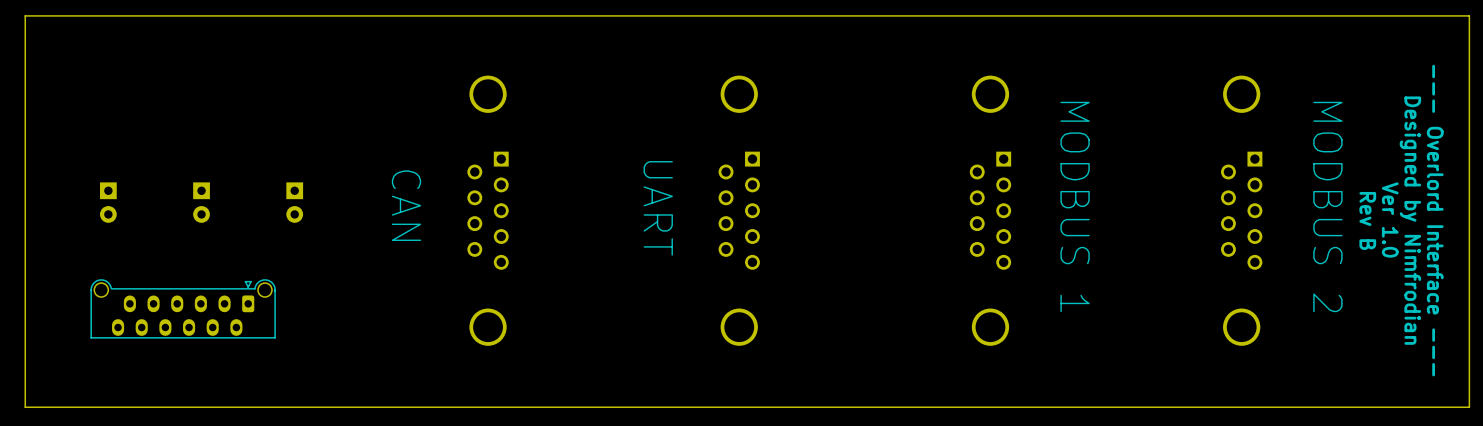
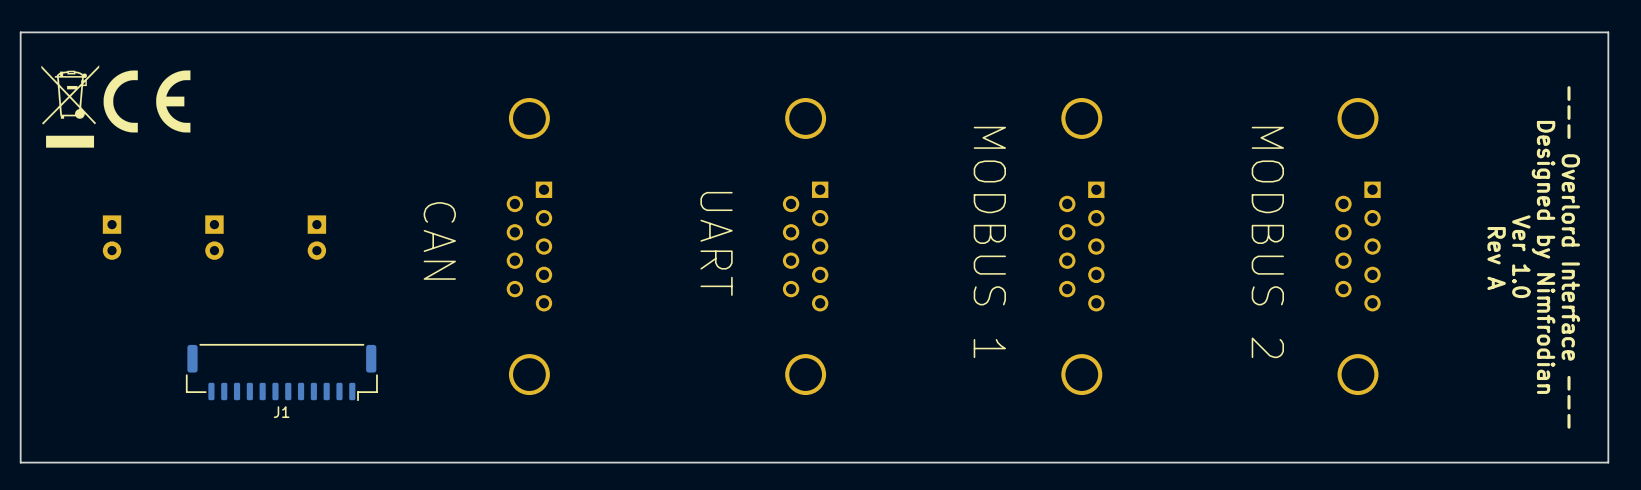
drawing: none -> [41, 65, 191, 148]
text position: MODBUS 1 (1075, 206) -> MODBUS 1 (989, 242)
text position: MODBUS 2 (1327, 206) -> MODBUS 2 (1267, 242)
text: Rev B (1367, 220) -> Rev A (1496, 258)
part: (183, 308) -> none
J1: none -> (281, 372)

